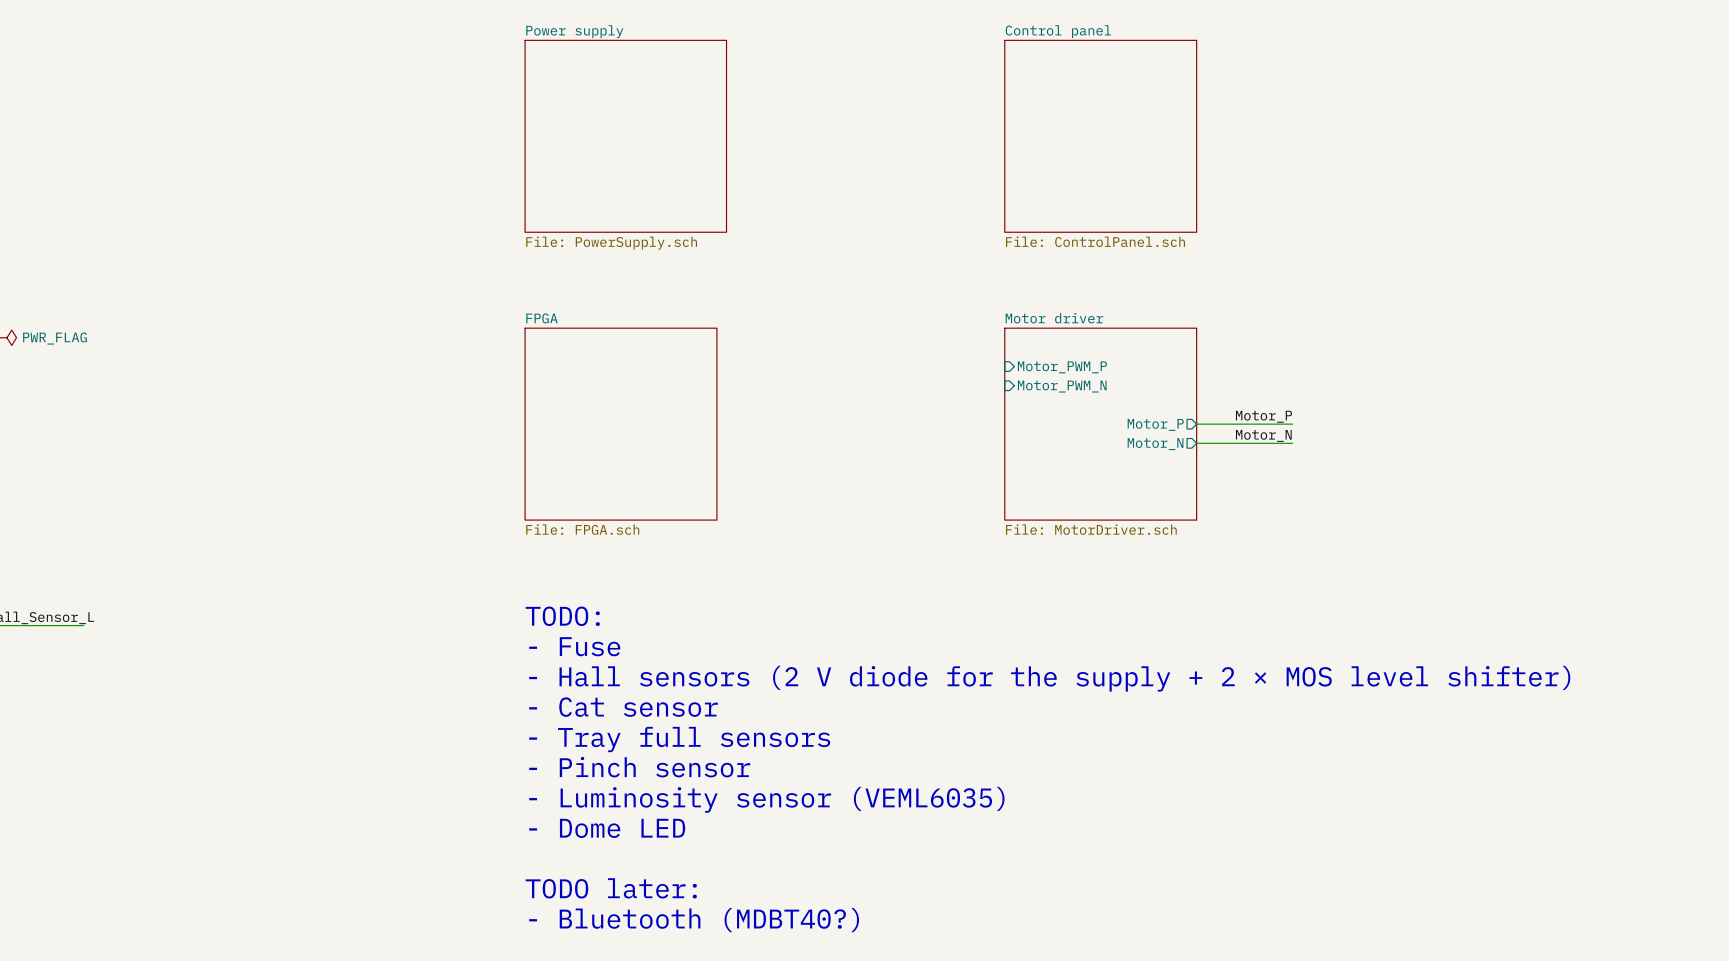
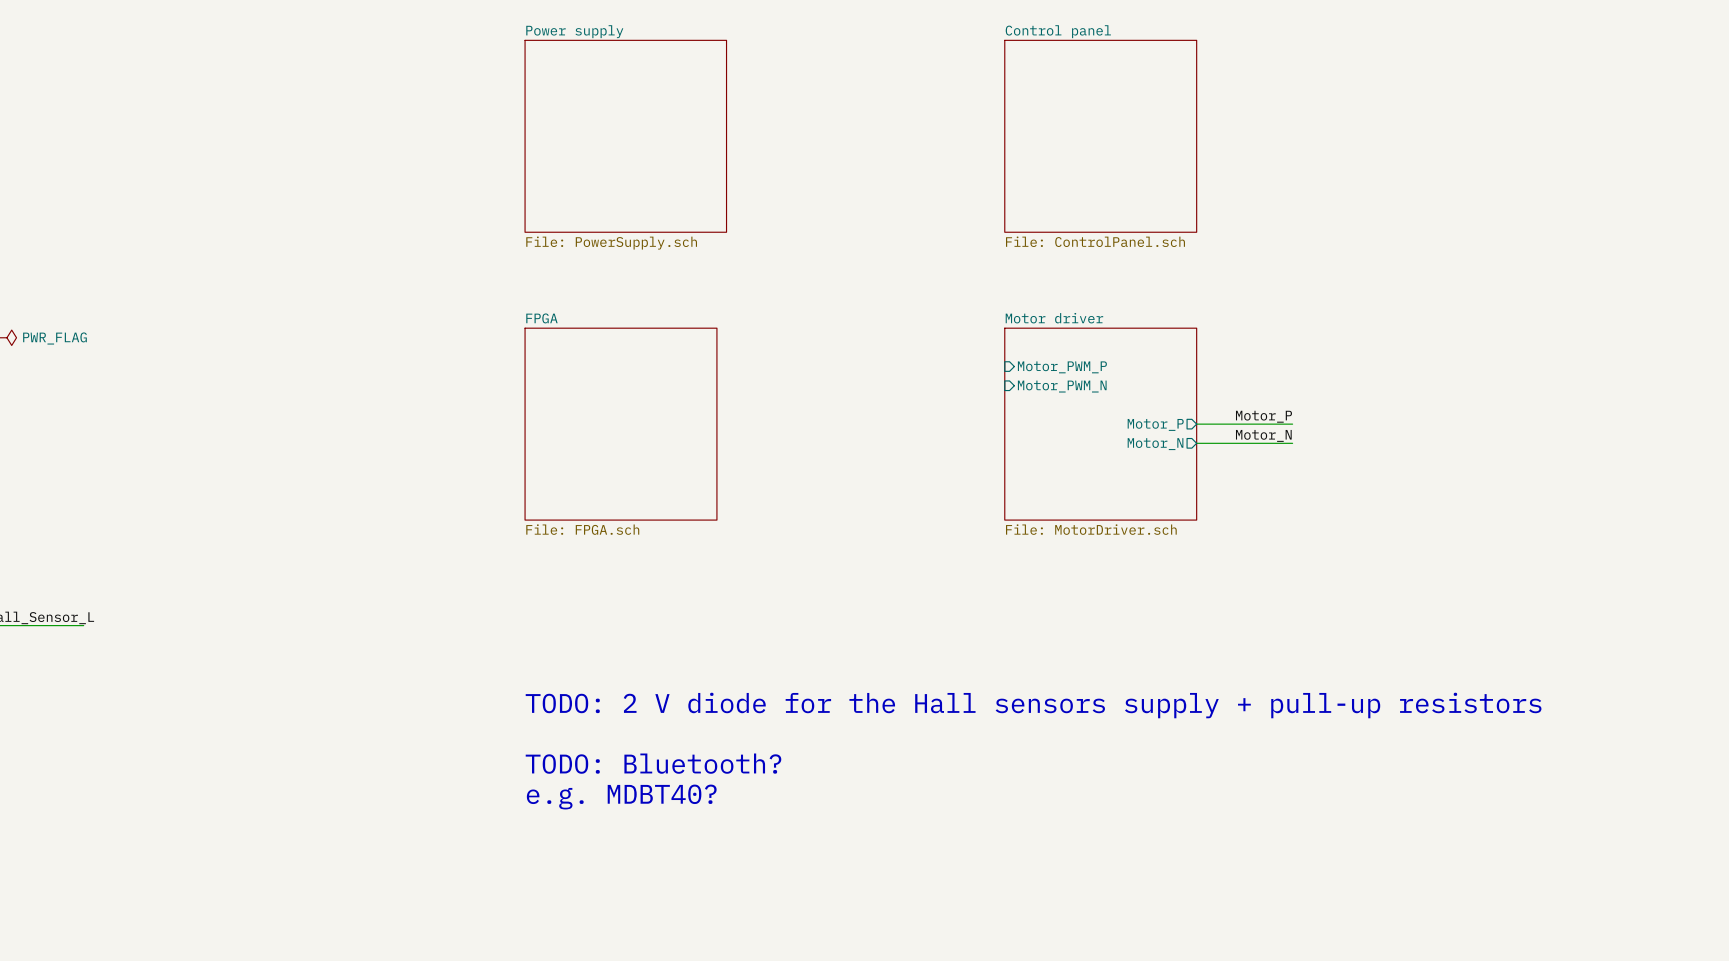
text: TODO: (562, 616) -> none
text: - Fuse (574, 646) -> none
text: - Hall sensors (2 V diode for the supply + 2 × MOS level shifter) (1049, 678) -> none
text: - Cat sensor (623, 707) -> TODO: 2 V diode for the Hall sensors supply + pull-up resistors (1033, 705)
text: - Tray full sensors (679, 739) -> none
text: - Pinch sensor (639, 767) -> TODO: Bluetooth? (653, 763)
text: - Luminosity sensor (VEML6035) (766, 799) -> e.g. MDBT40? (621, 797)
text: - Dome LED (607, 828) -> none
text: TODO later: (611, 888) -> none
text: - Bluetooth (MDBT40?) (694, 920) -> none

